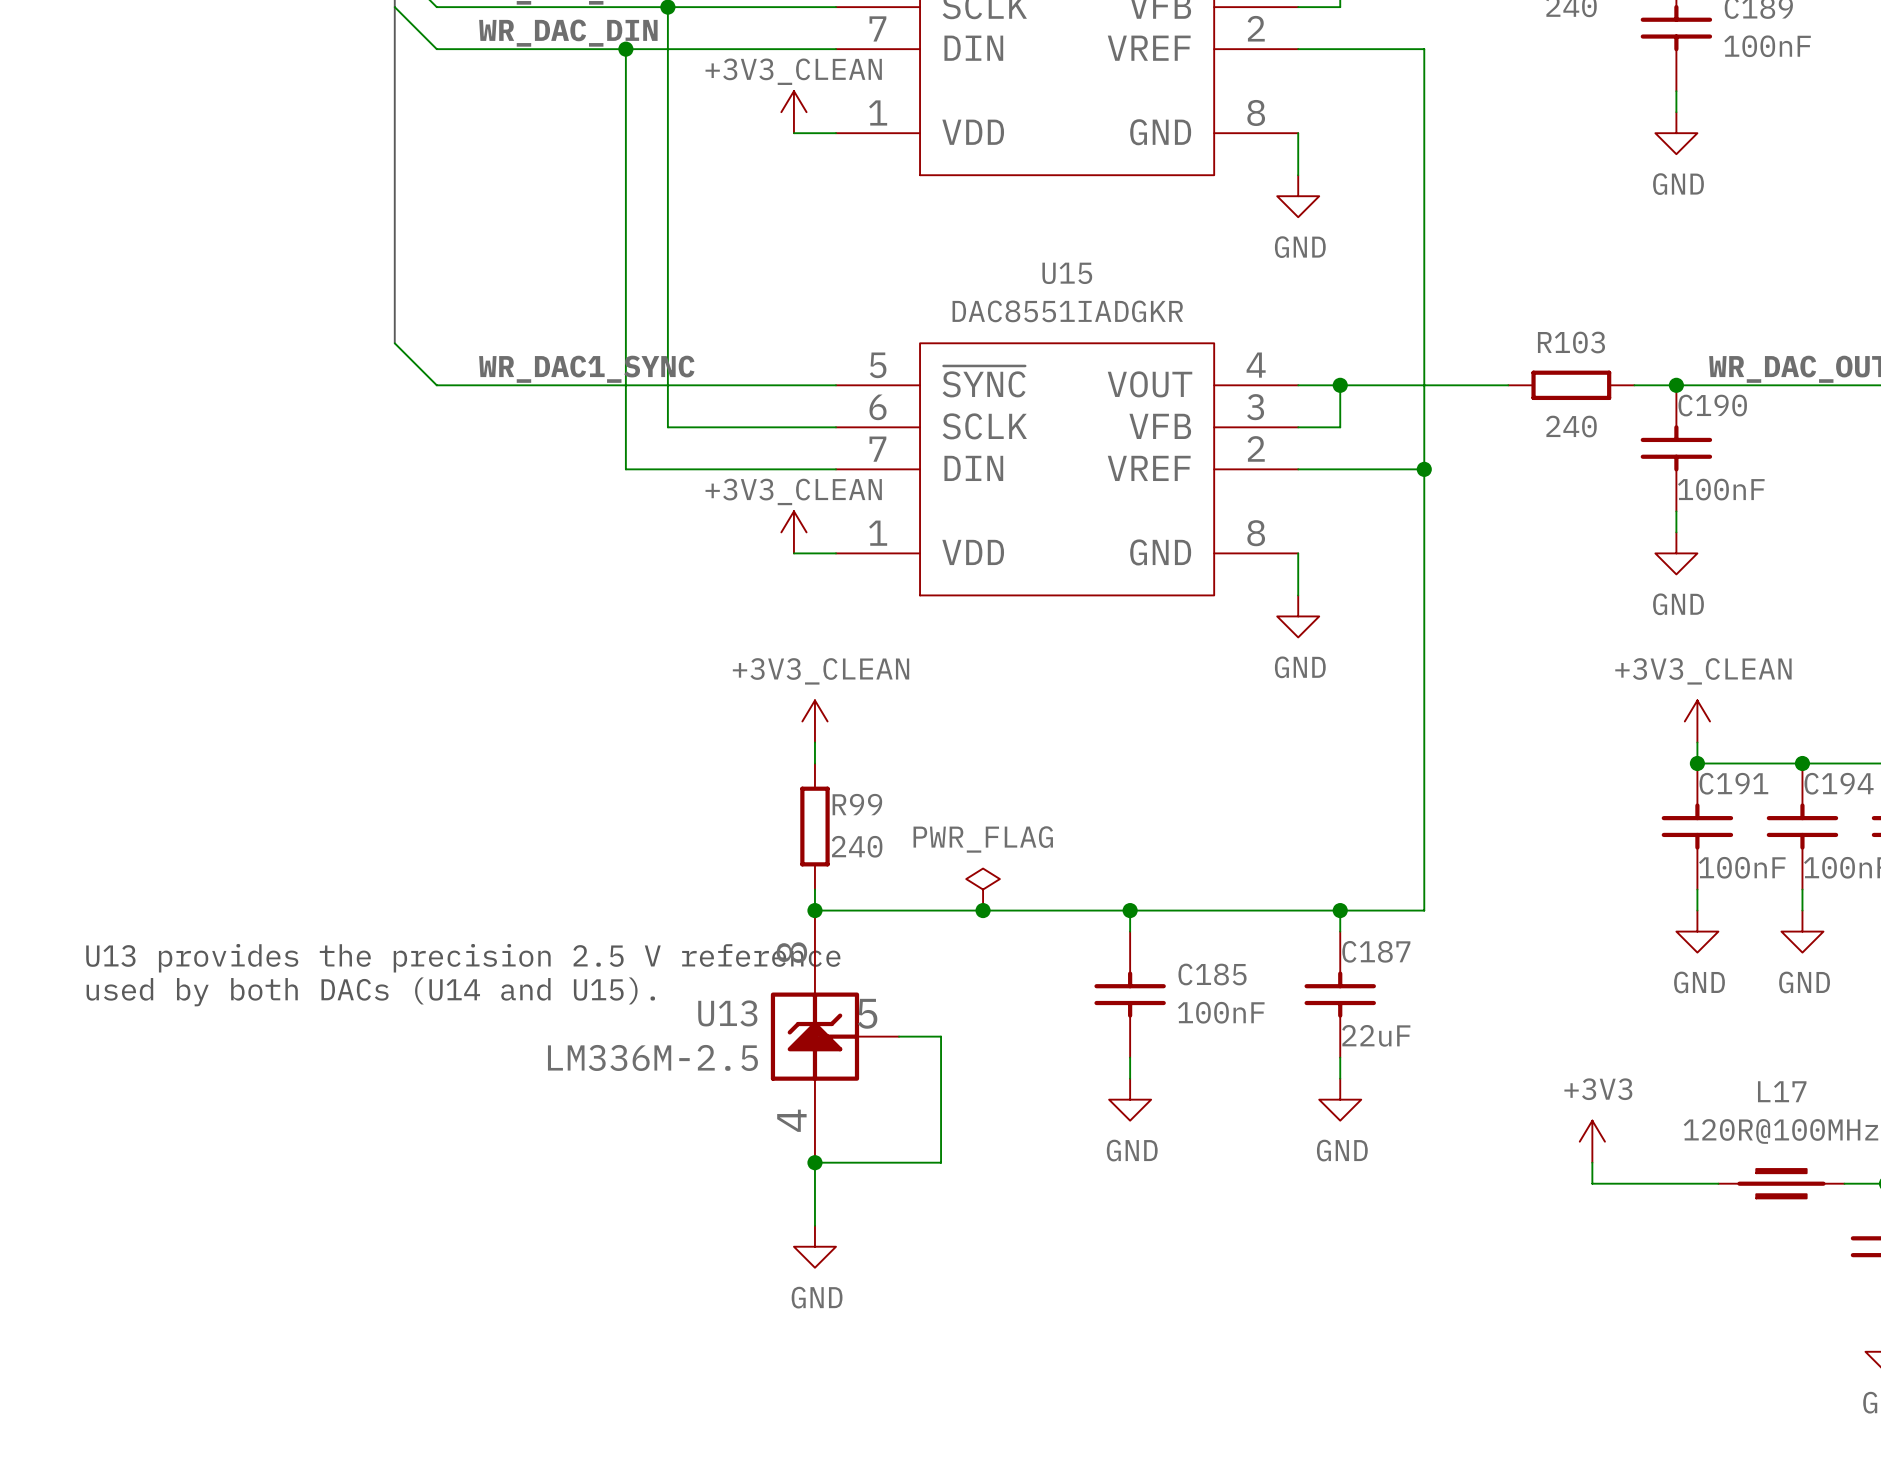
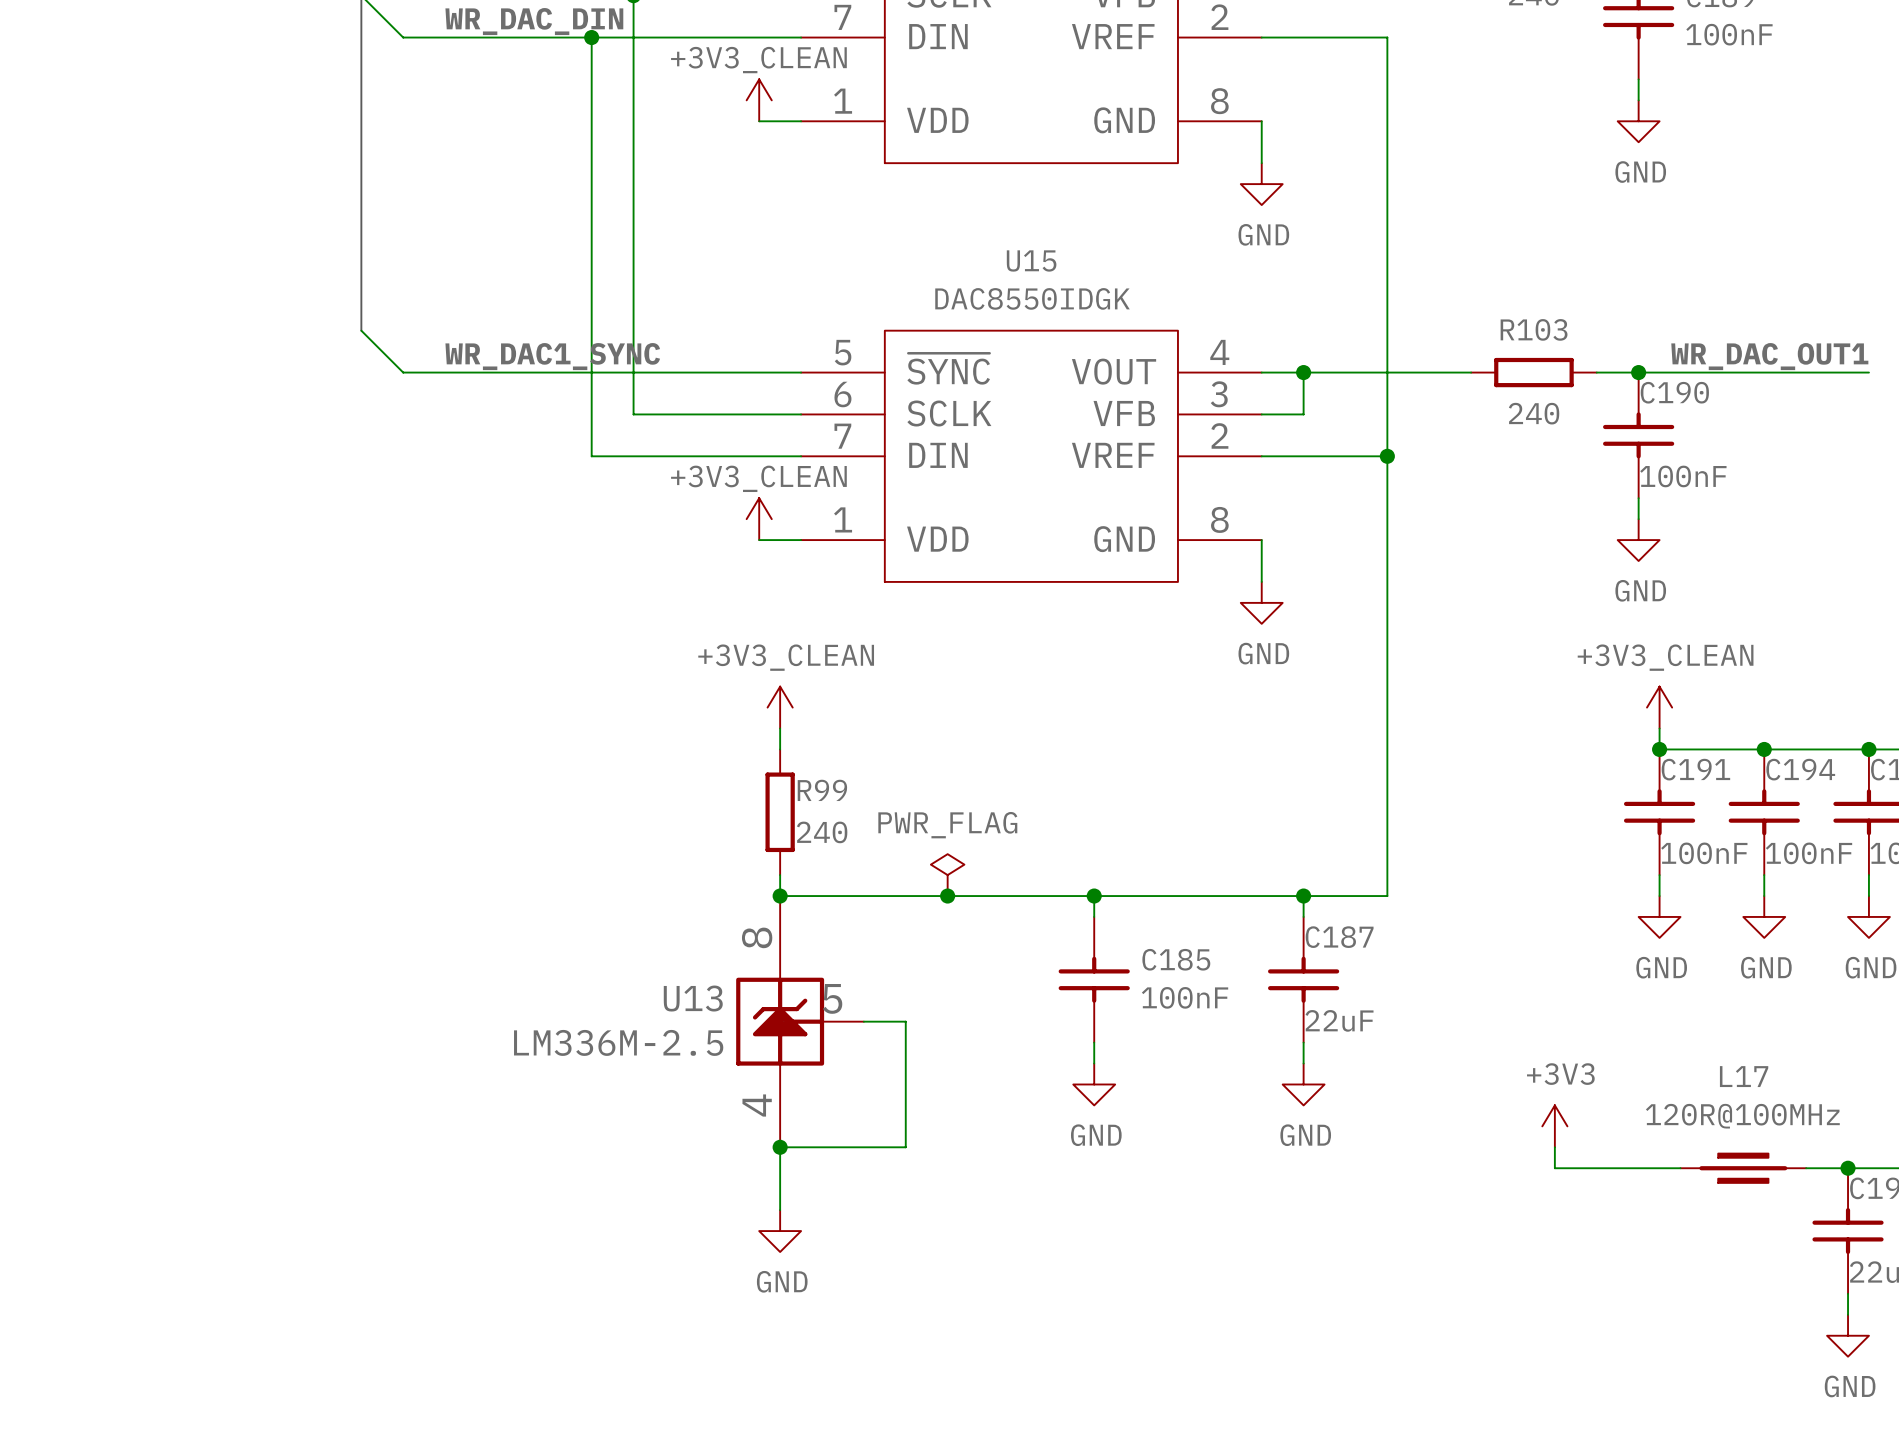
U15 value: DAC8551IADGKR (1067, 311) -> DAC8550IDGK (1032, 298)
text: U13 provides the precision 2.5 V reference (463, 958) -> none
text: used by both DACs (U14 and U15). (370, 991) -> none

